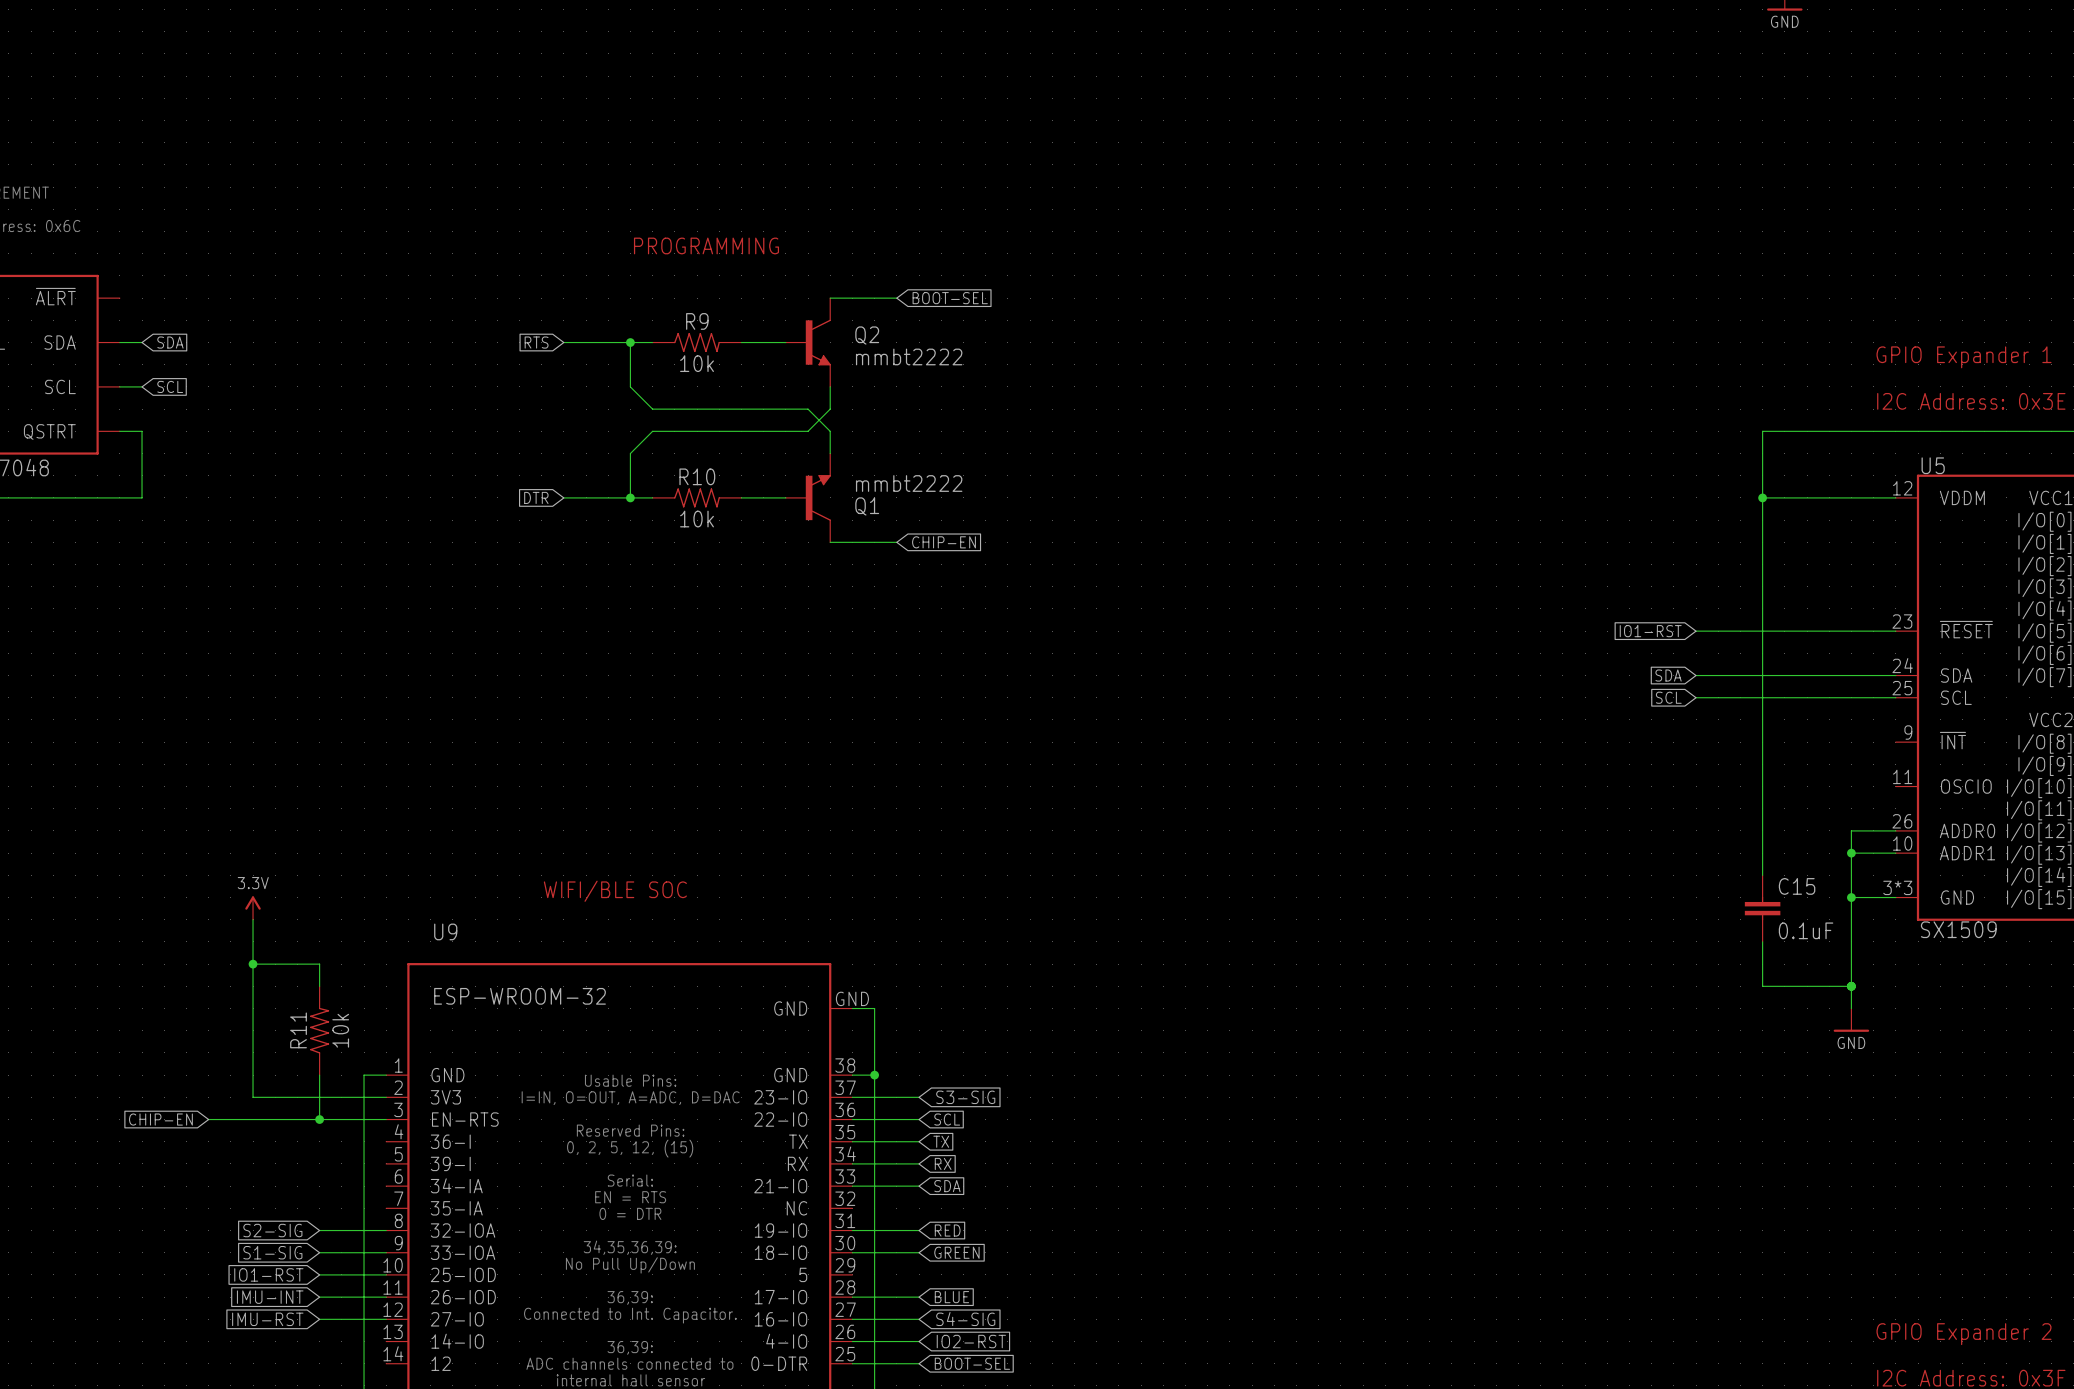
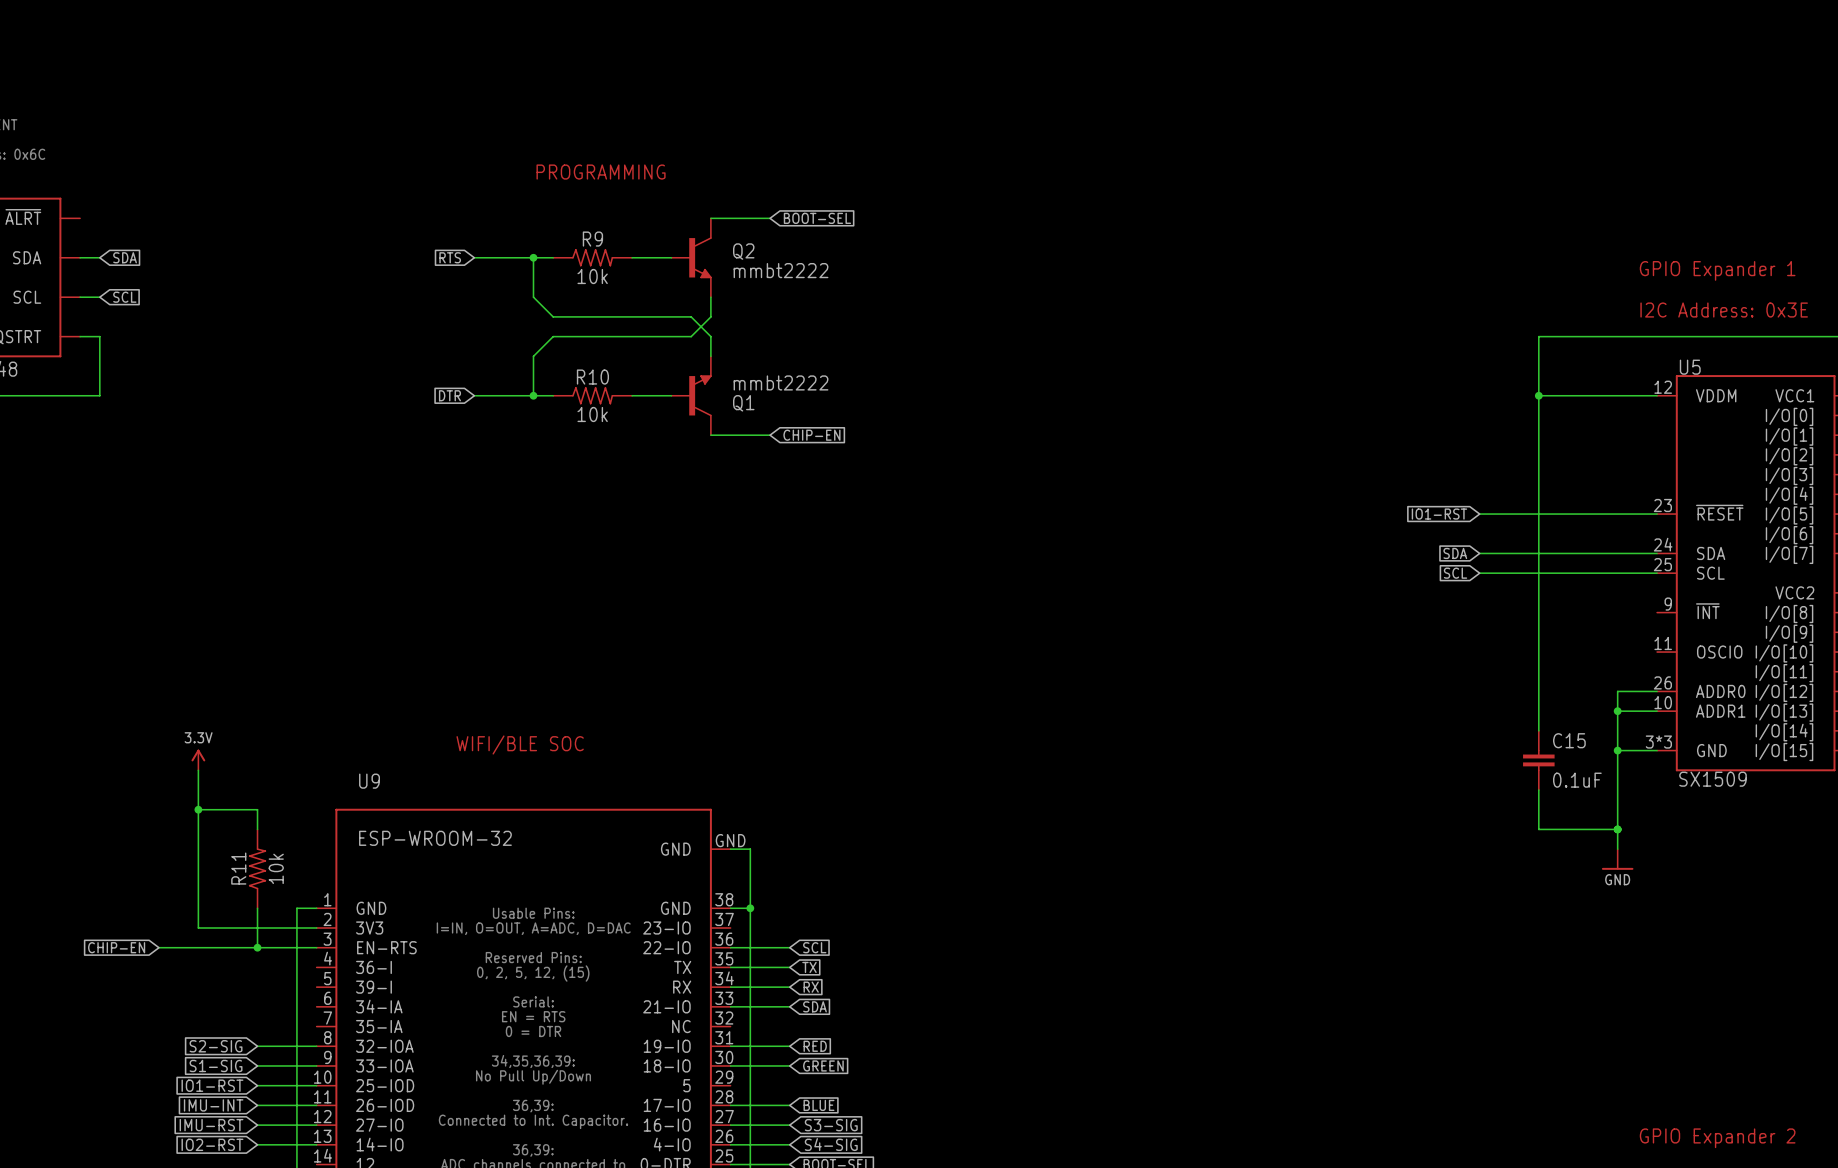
wire: (852, 1097) (919, 1097) -> none
global label: S3-SIG (965, 1097) -> none
global label: S4-SIG (965, 1319) -> S3-SIG (831, 1125)
global label: none -> IO2-RST (212, 1144)
wire: none -> (257, 1144) (316, 1144)
global label: IO2-RST (971, 1341) -> S4-SIG (831, 1144)

